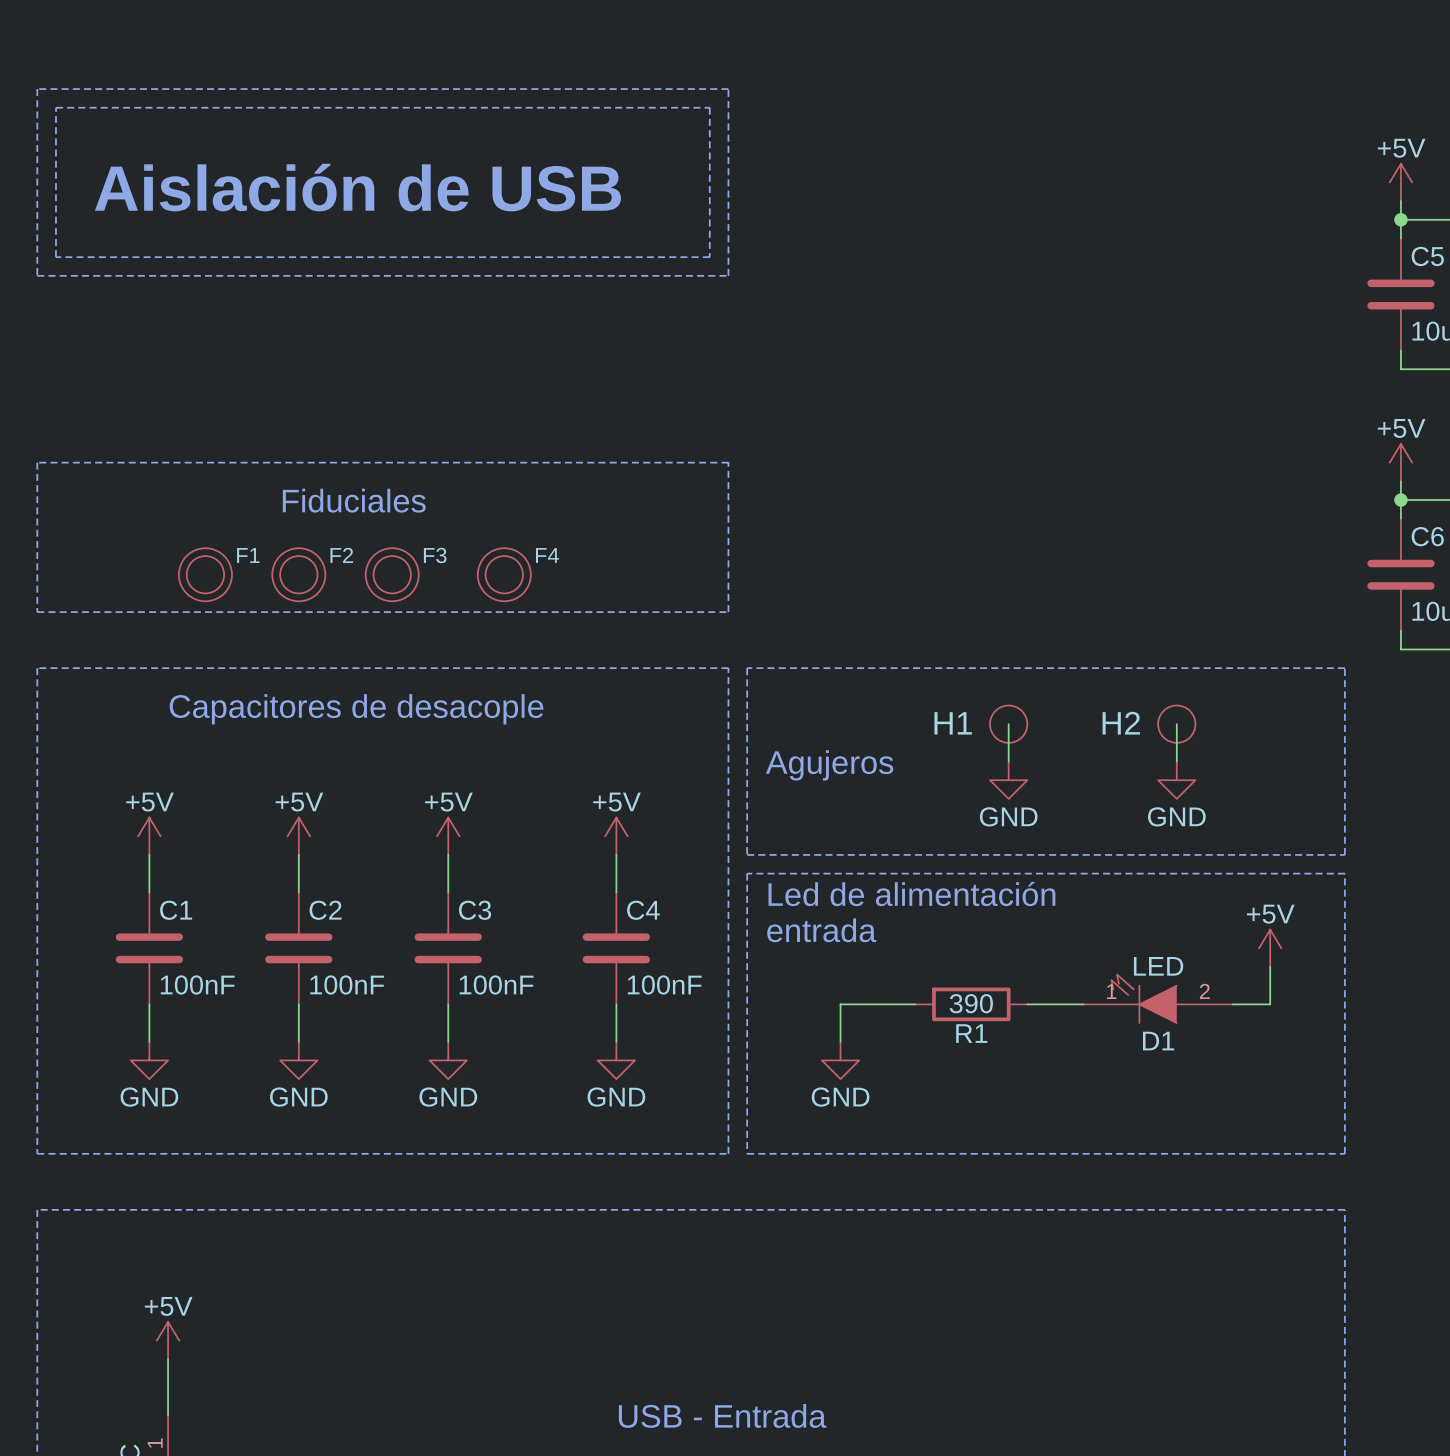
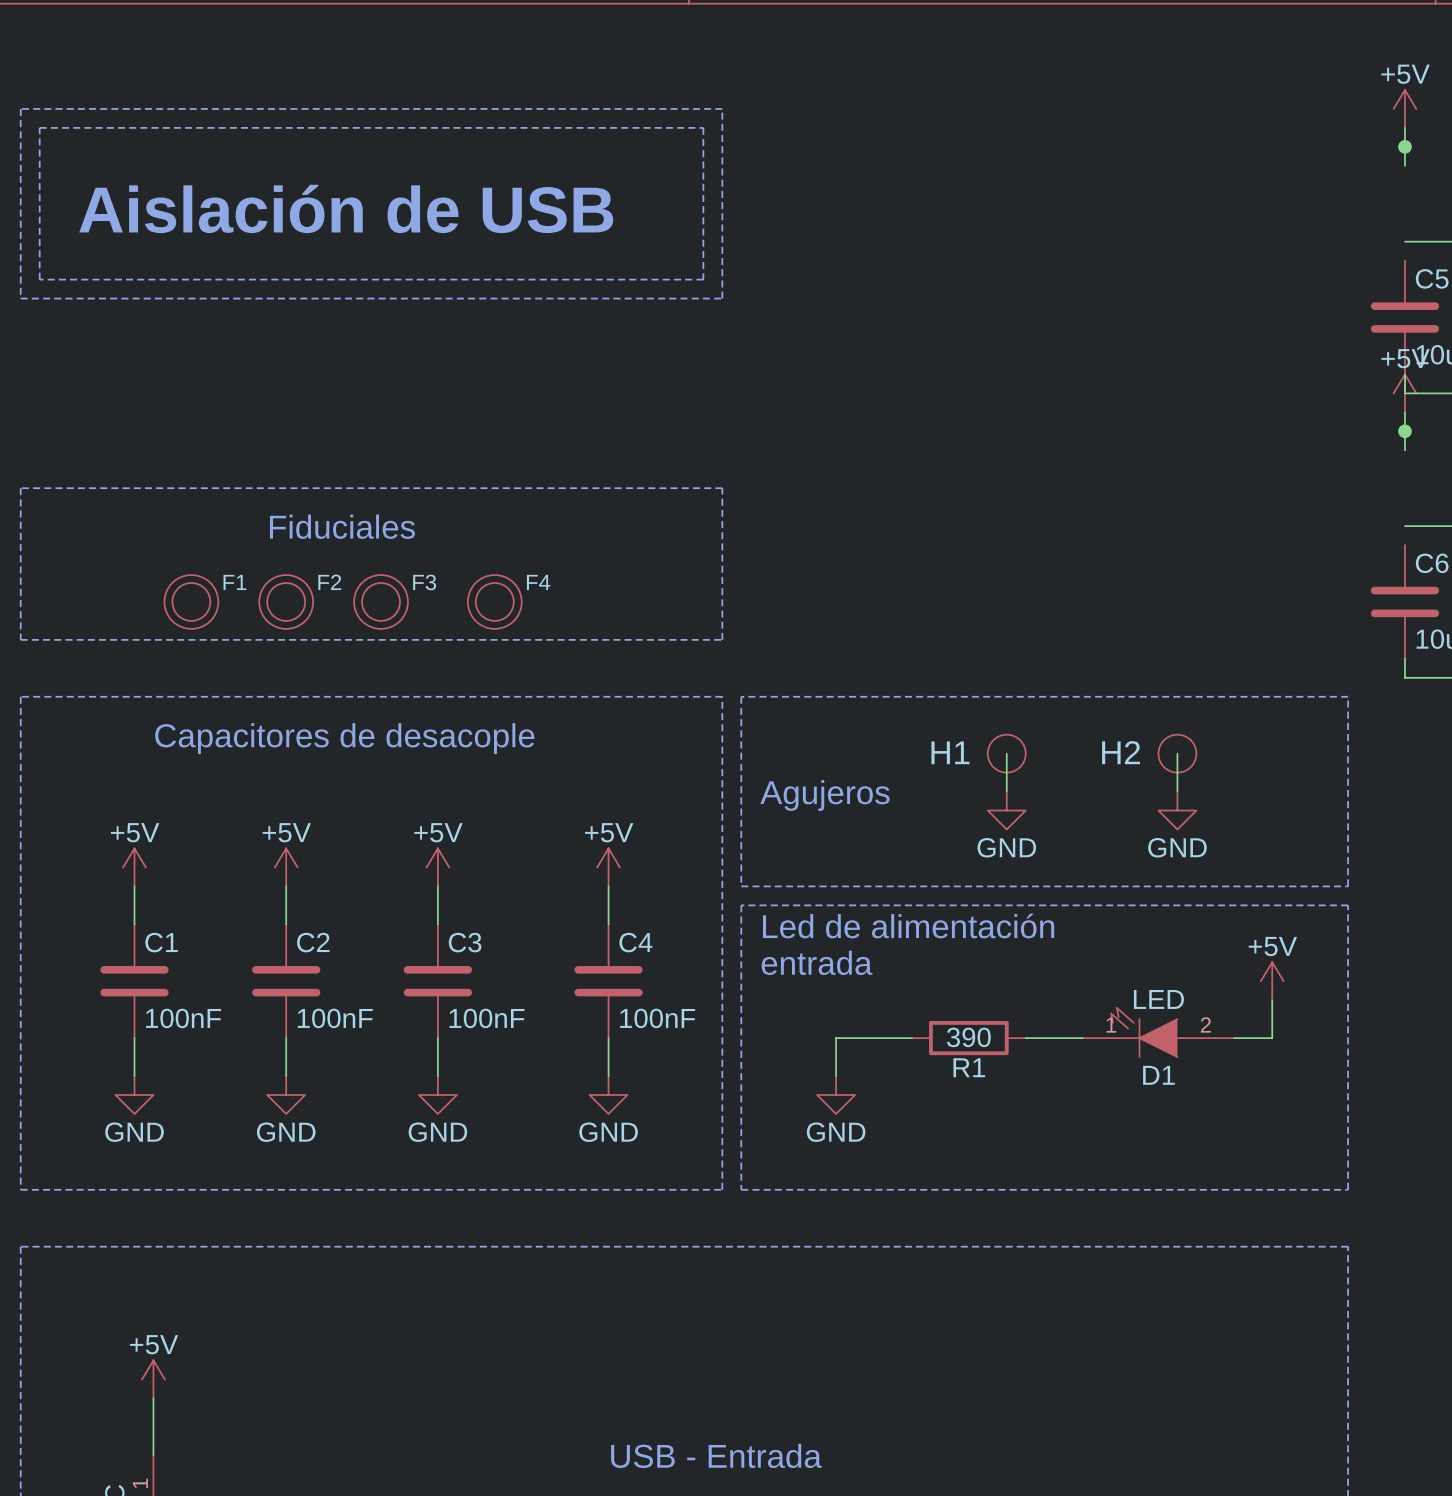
power symbol: none -> +5V (1404, 108)
junction: none -> (1404, 146)
power symbol: +5V (1400, 182) -> none
wire: (1400, 201) (1400, 238) -> (1404, 127) (1404, 165)
junction: (1400, 219) -> none
power symbol: none -> +5V (1404, 393)
junction: none -> (1404, 431)
power symbol: +5V (1400, 462) -> none
wire: (1400, 481) (1400, 518) -> (1404, 412) (1404, 450)
junction: (1400, 500) -> none

